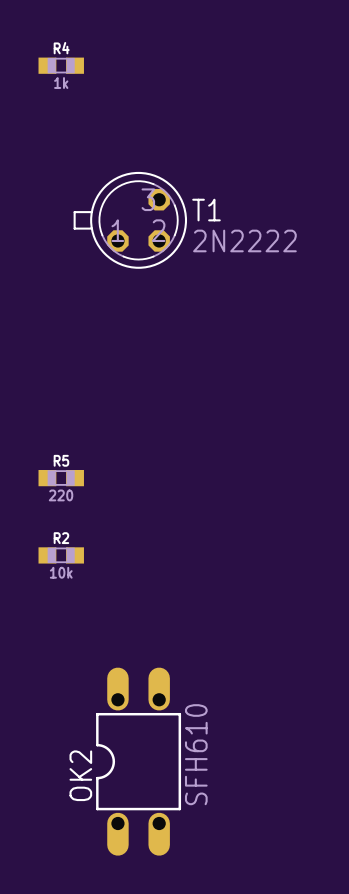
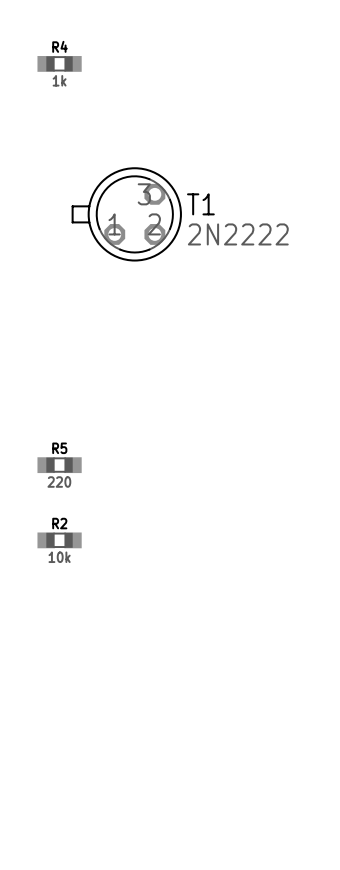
OK2: SFH610 (138, 761) -> none

